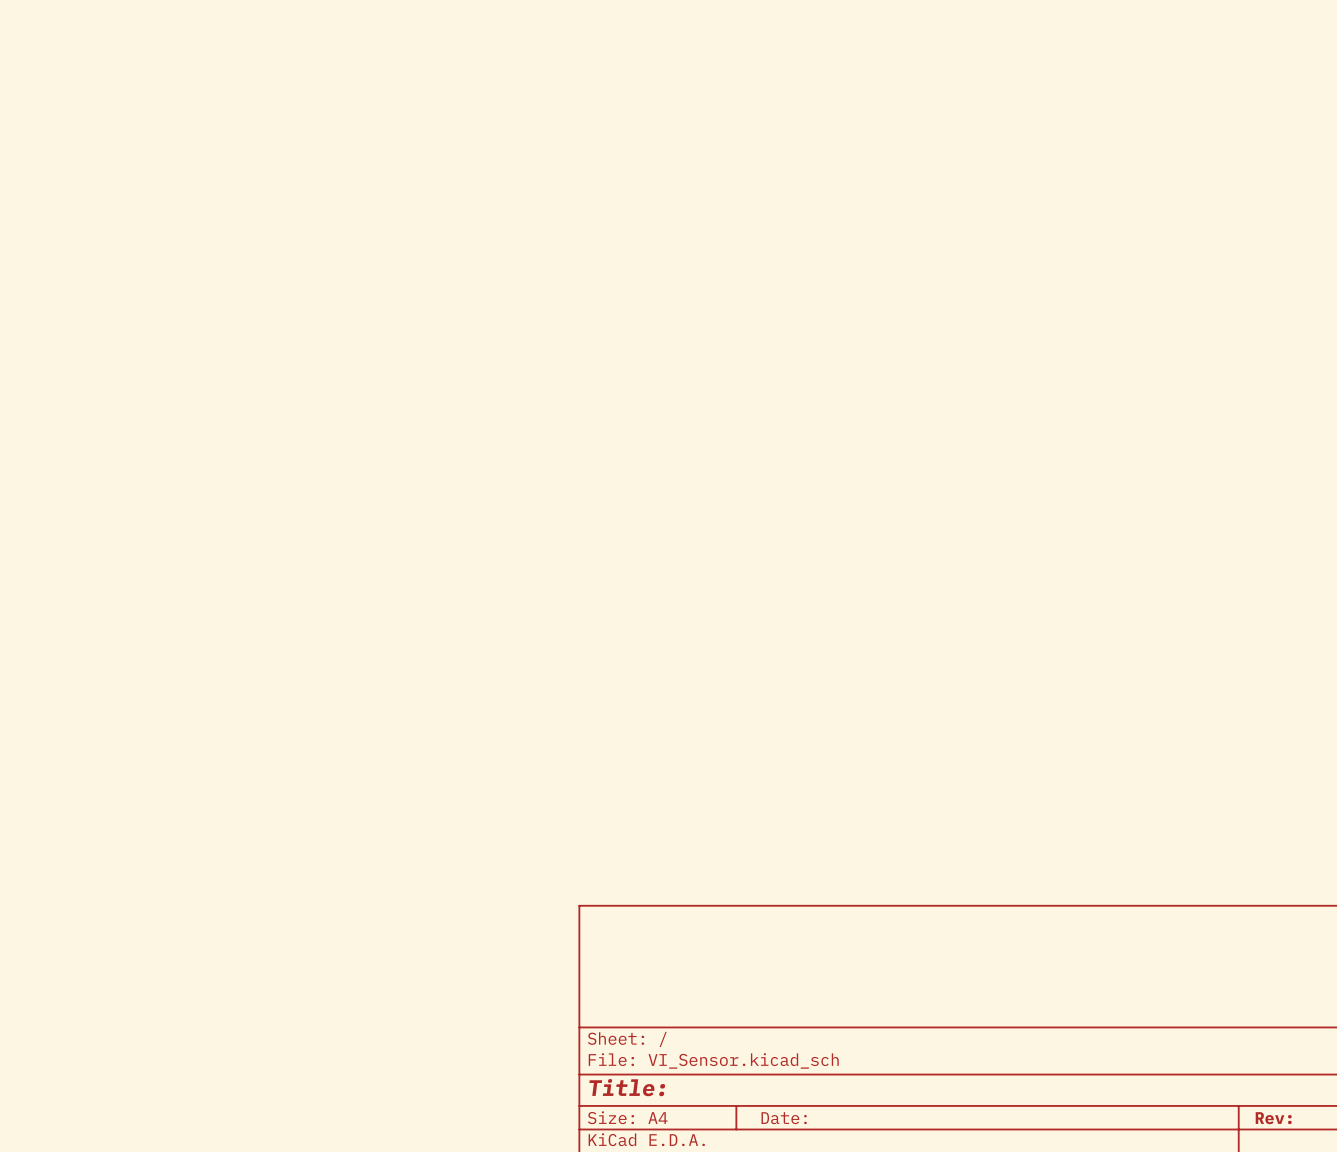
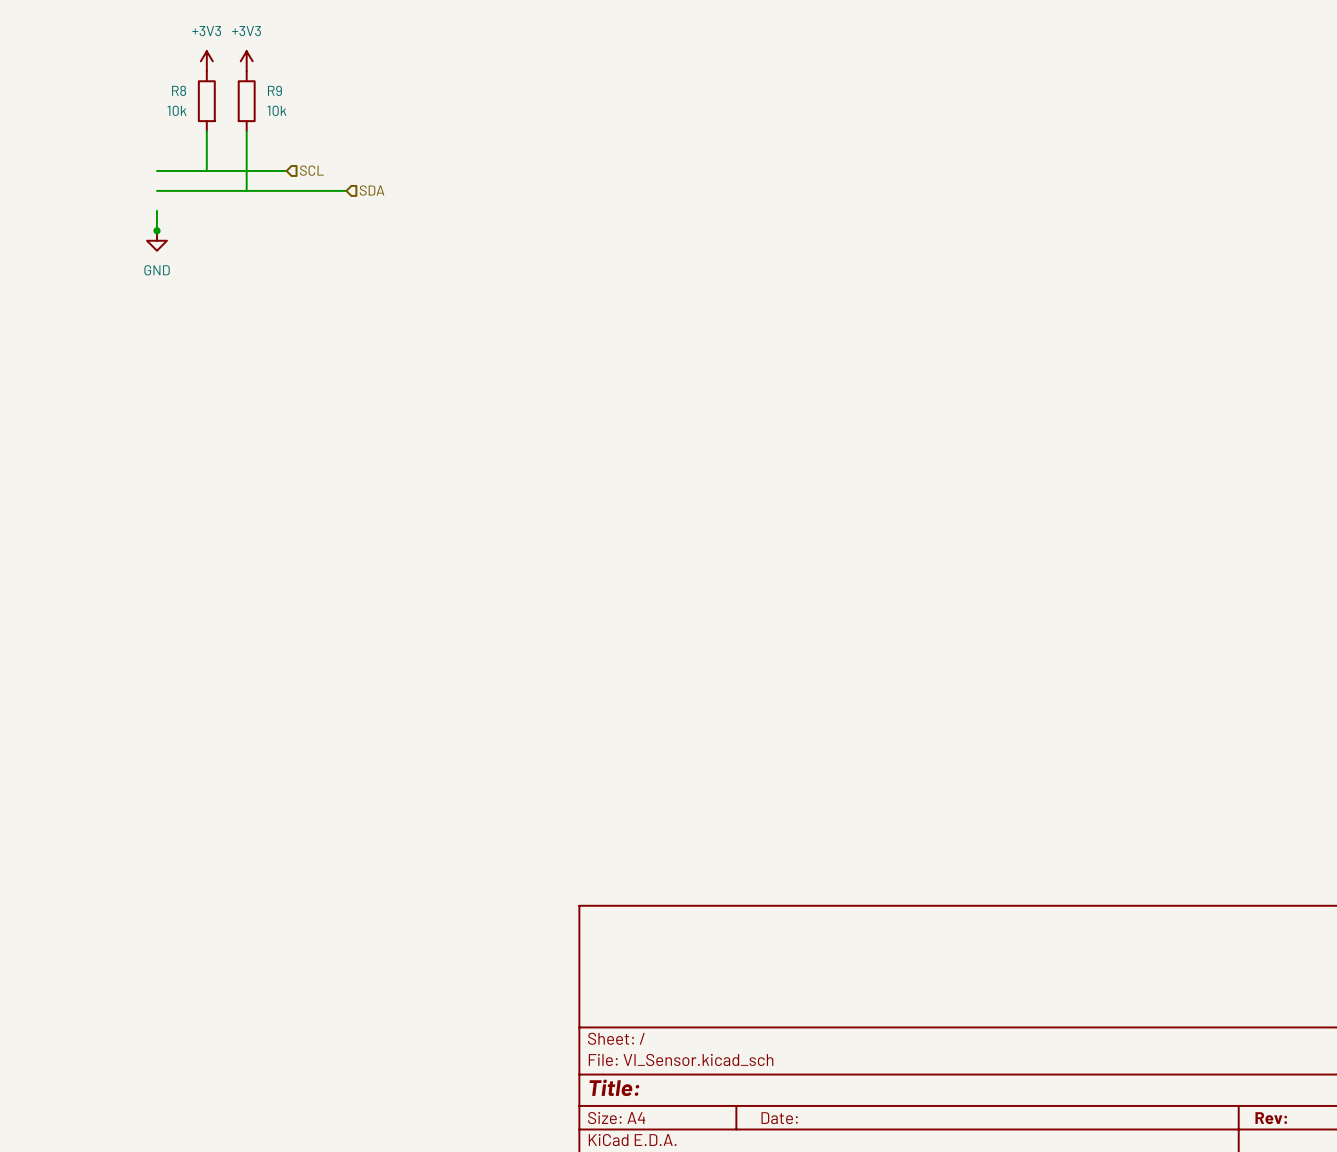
power symbol: none -> +3V3 (206, 61)
power symbol: none -> +3V3 (246, 61)
R8: none -> 10k (206, 101)
R9: none -> 10k (246, 101)
wire: none -> (206, 131) (206, 170)
wire: none -> (246, 131) (246, 190)
wire: none -> (156, 170) (286, 170)
hierarchical label: none -> SCL (311, 170)
wire: none -> (156, 190) (346, 190)
hierarchical label: none -> SDA (372, 190)
wire: none -> (156, 210) (156, 230)
junction: none -> (156, 230)
power symbol: none -> GND (156, 240)

